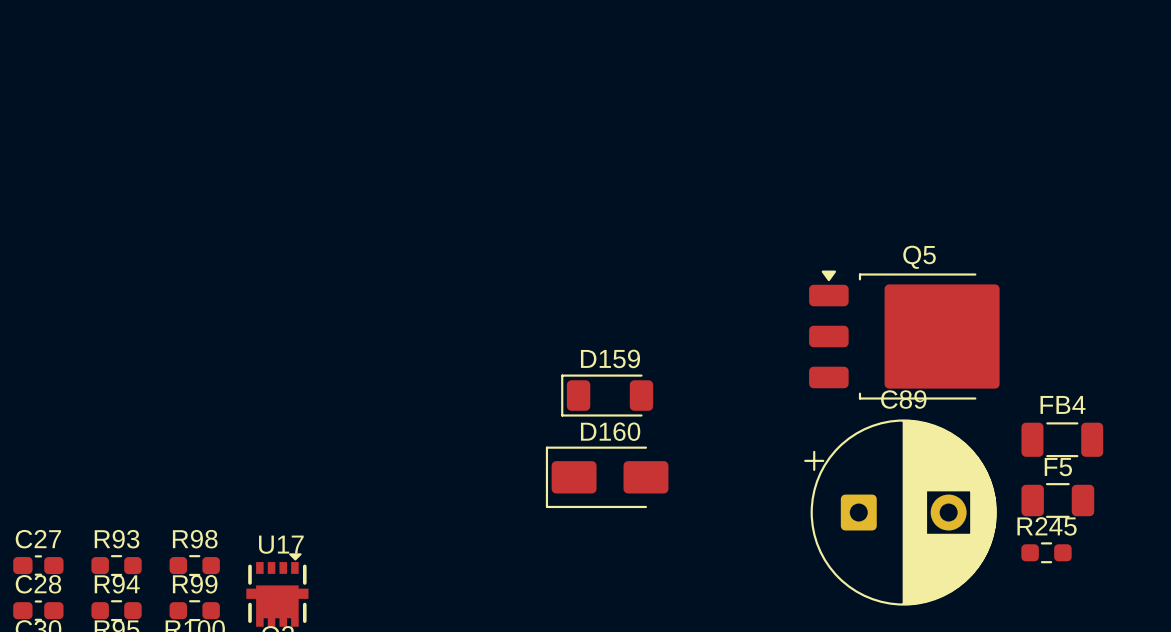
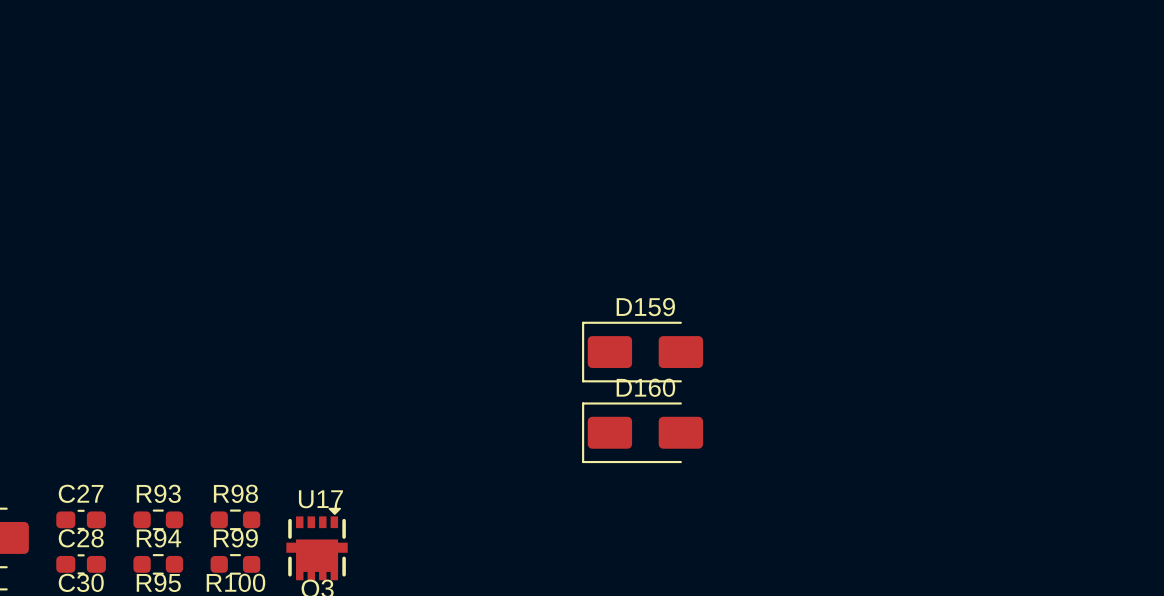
Q5: (904, 335) -> none
D159 footprint: [561, 374, 654, 417] -> [582, 321, 704, 383]
FB4: (1062, 439) -> none
F5: (1057, 500) -> none
C89: (900, 512) -> none
R245: (1046, 552) -> none

